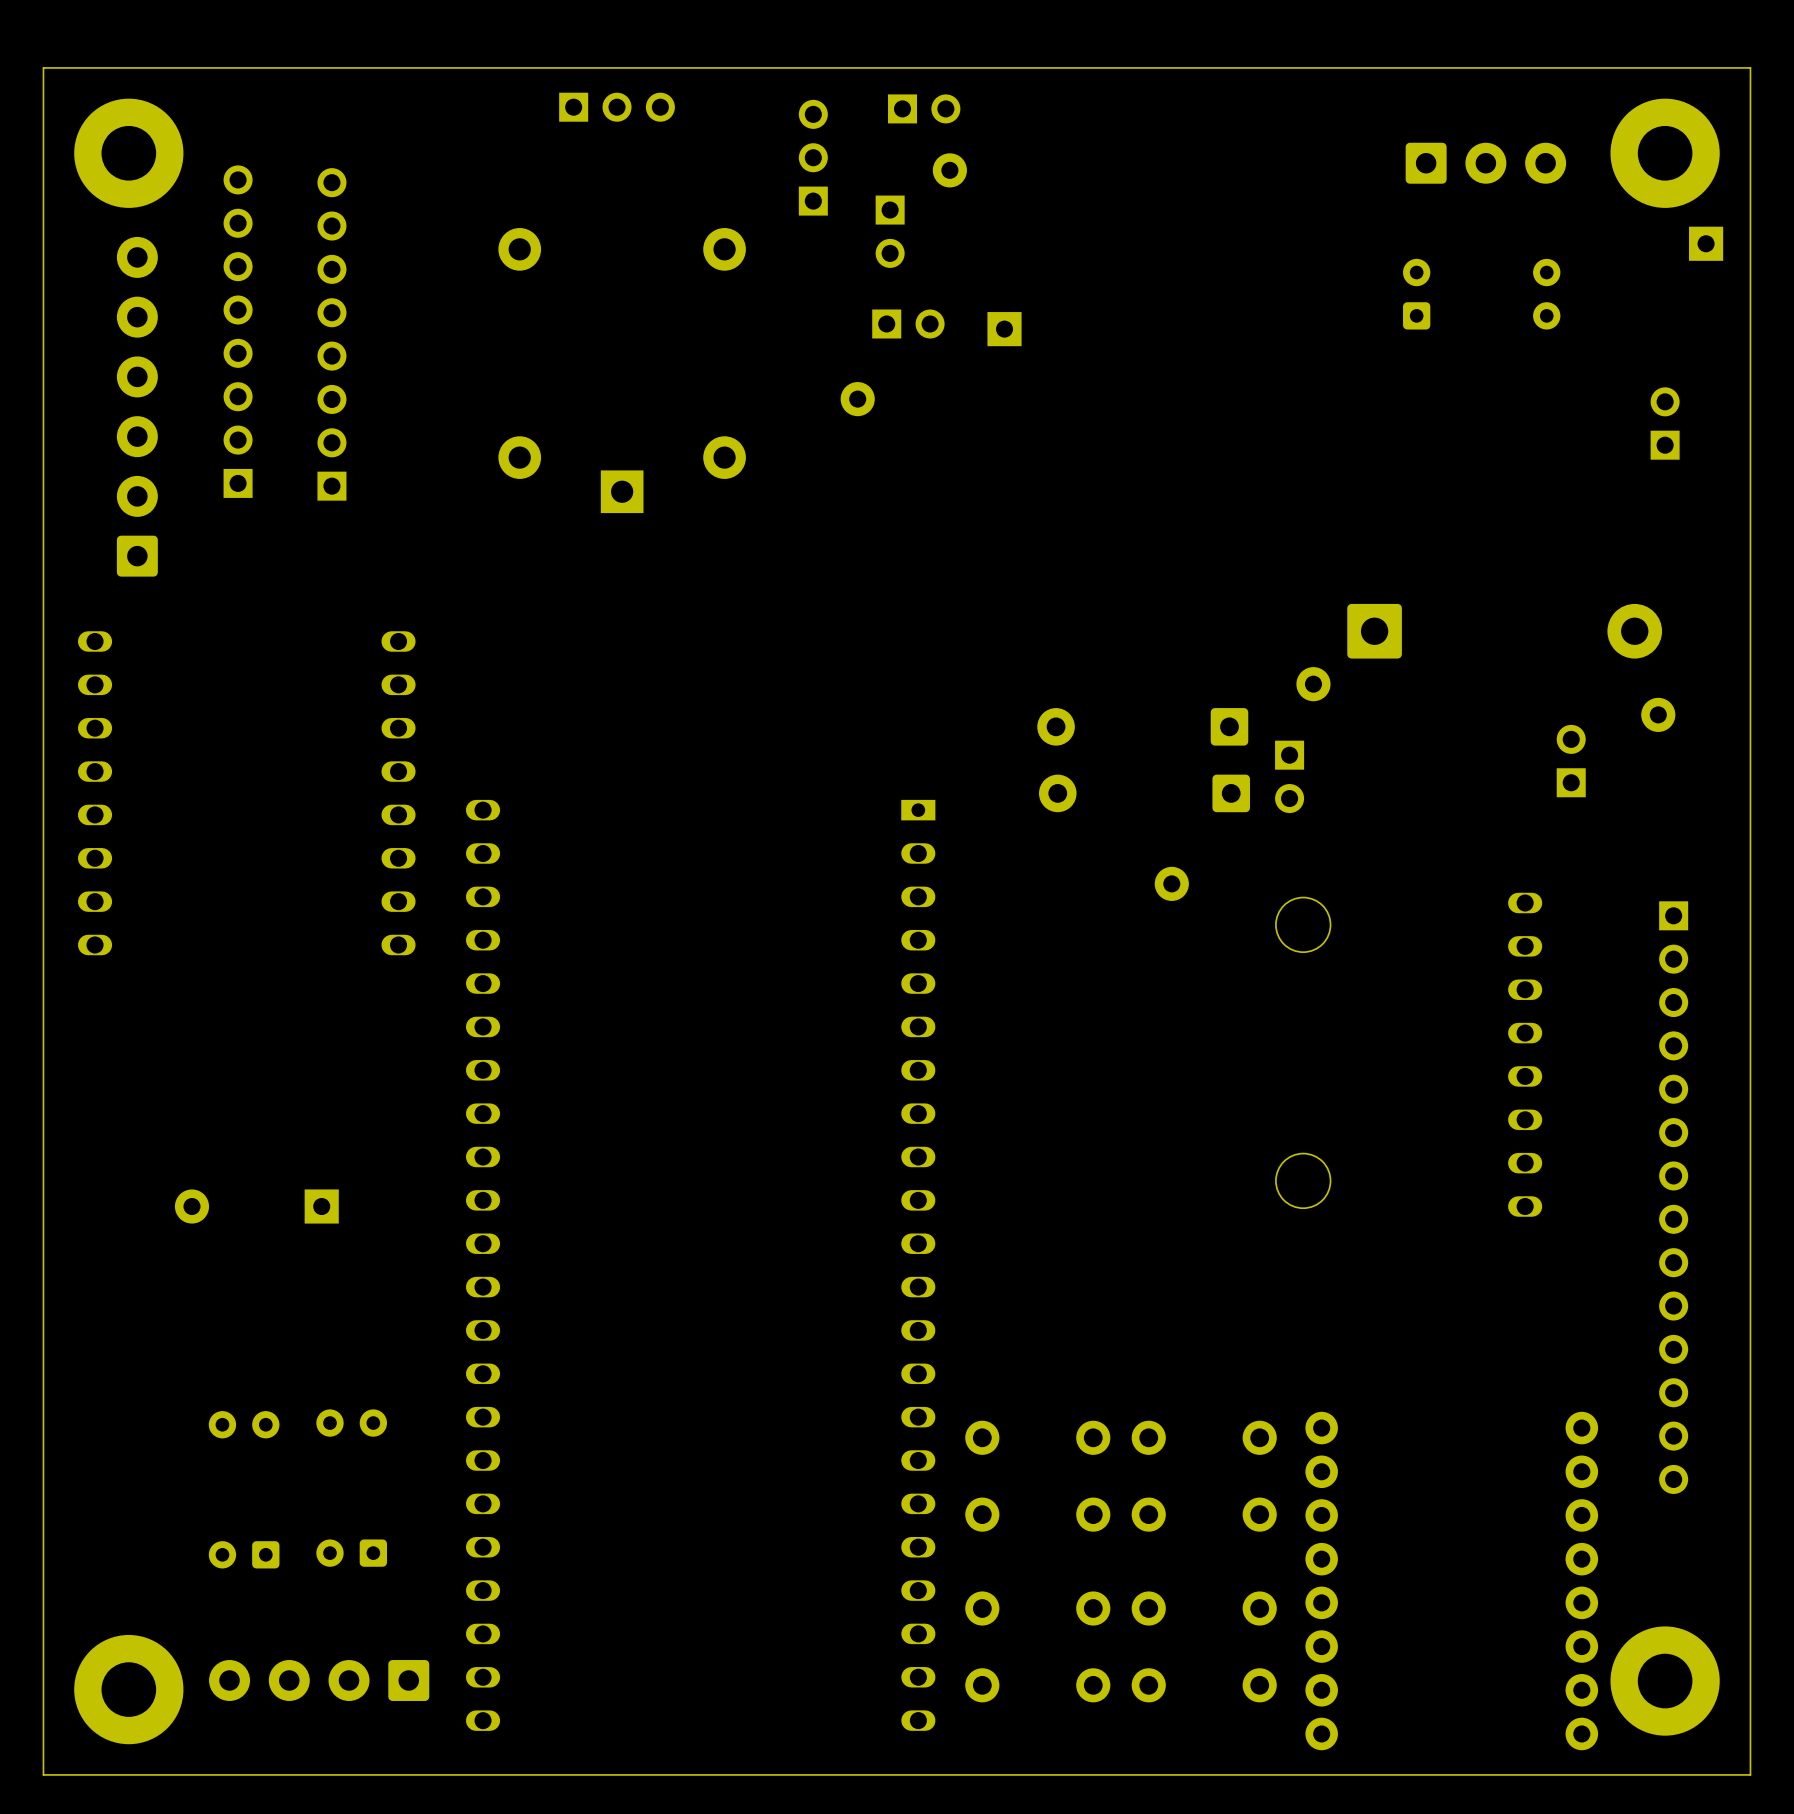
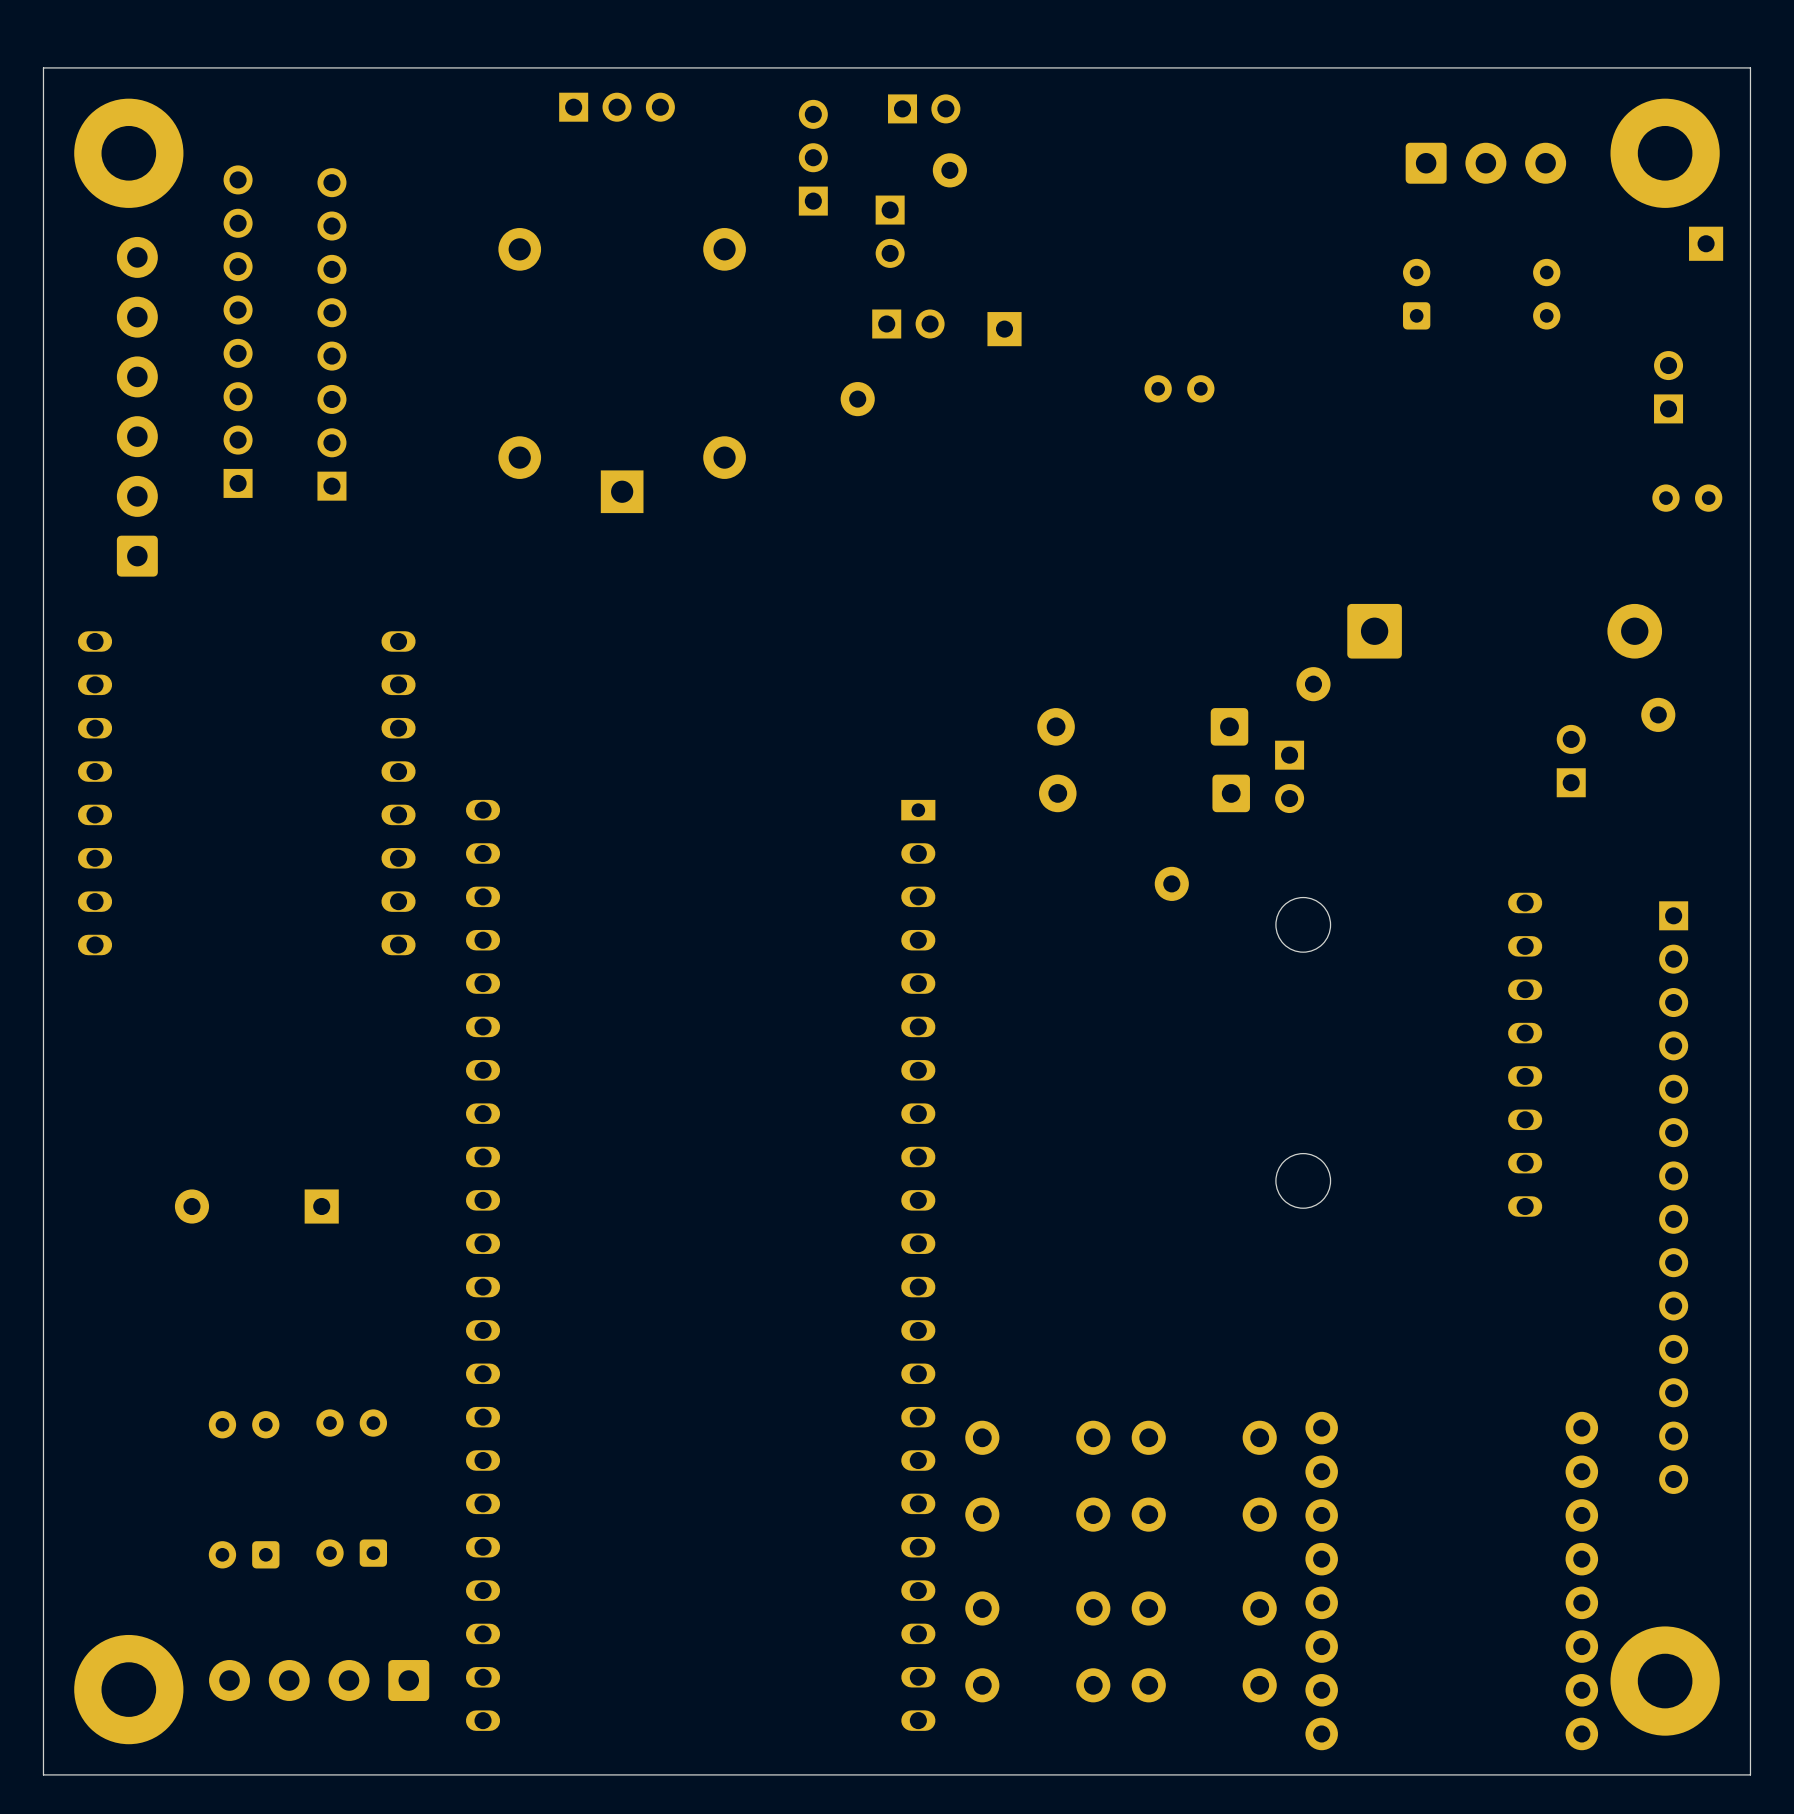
part: none -> (1179, 388)
part position: (1665, 423) -> (1668, 387)
part: none -> (1687, 498)

